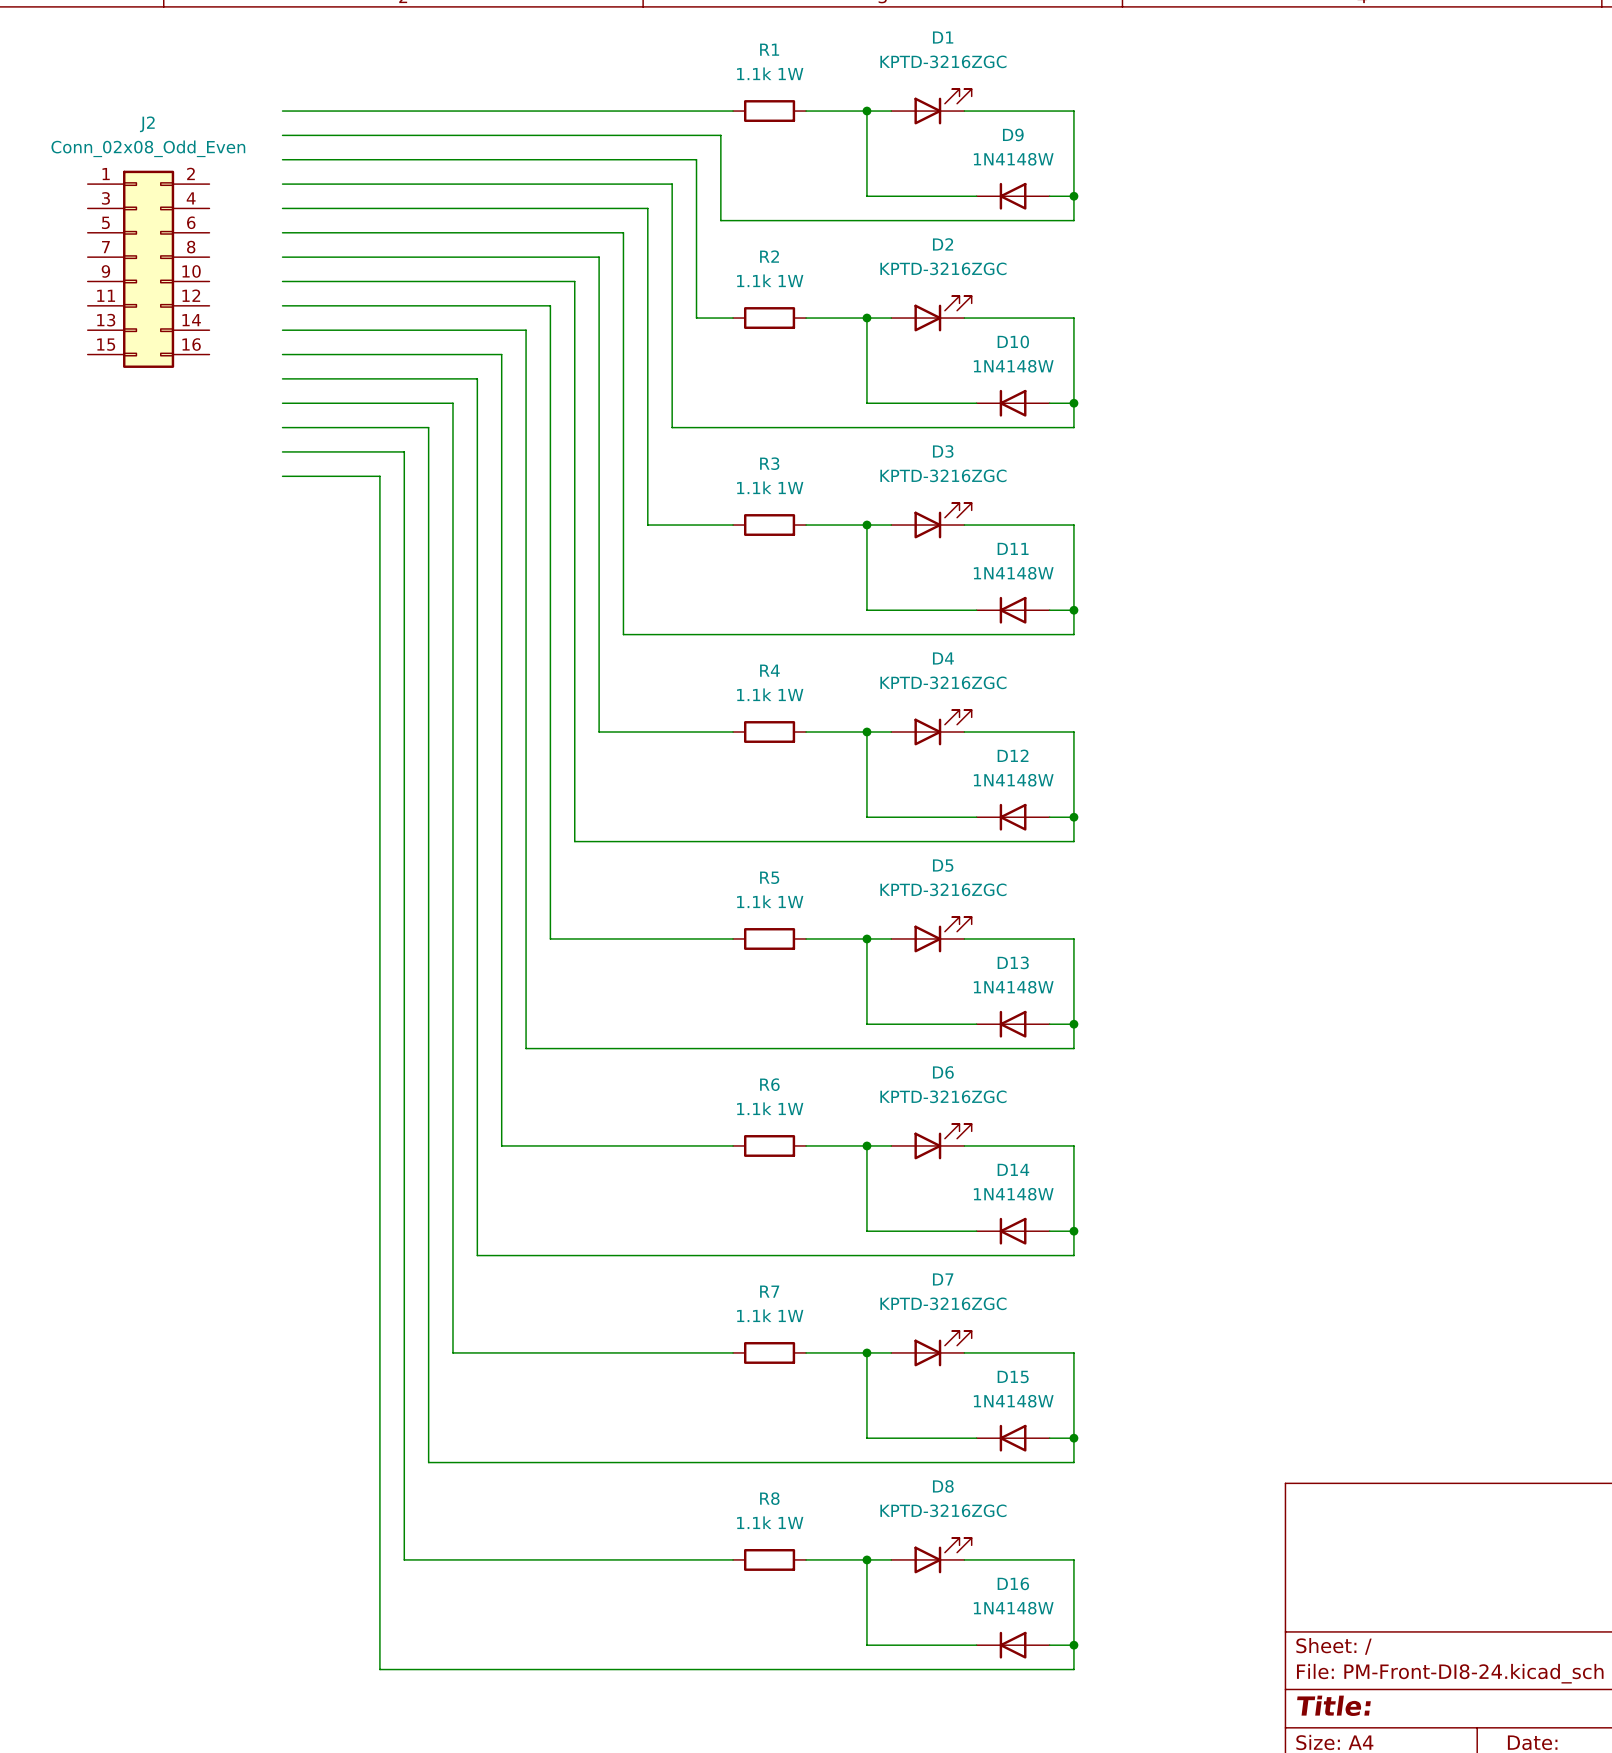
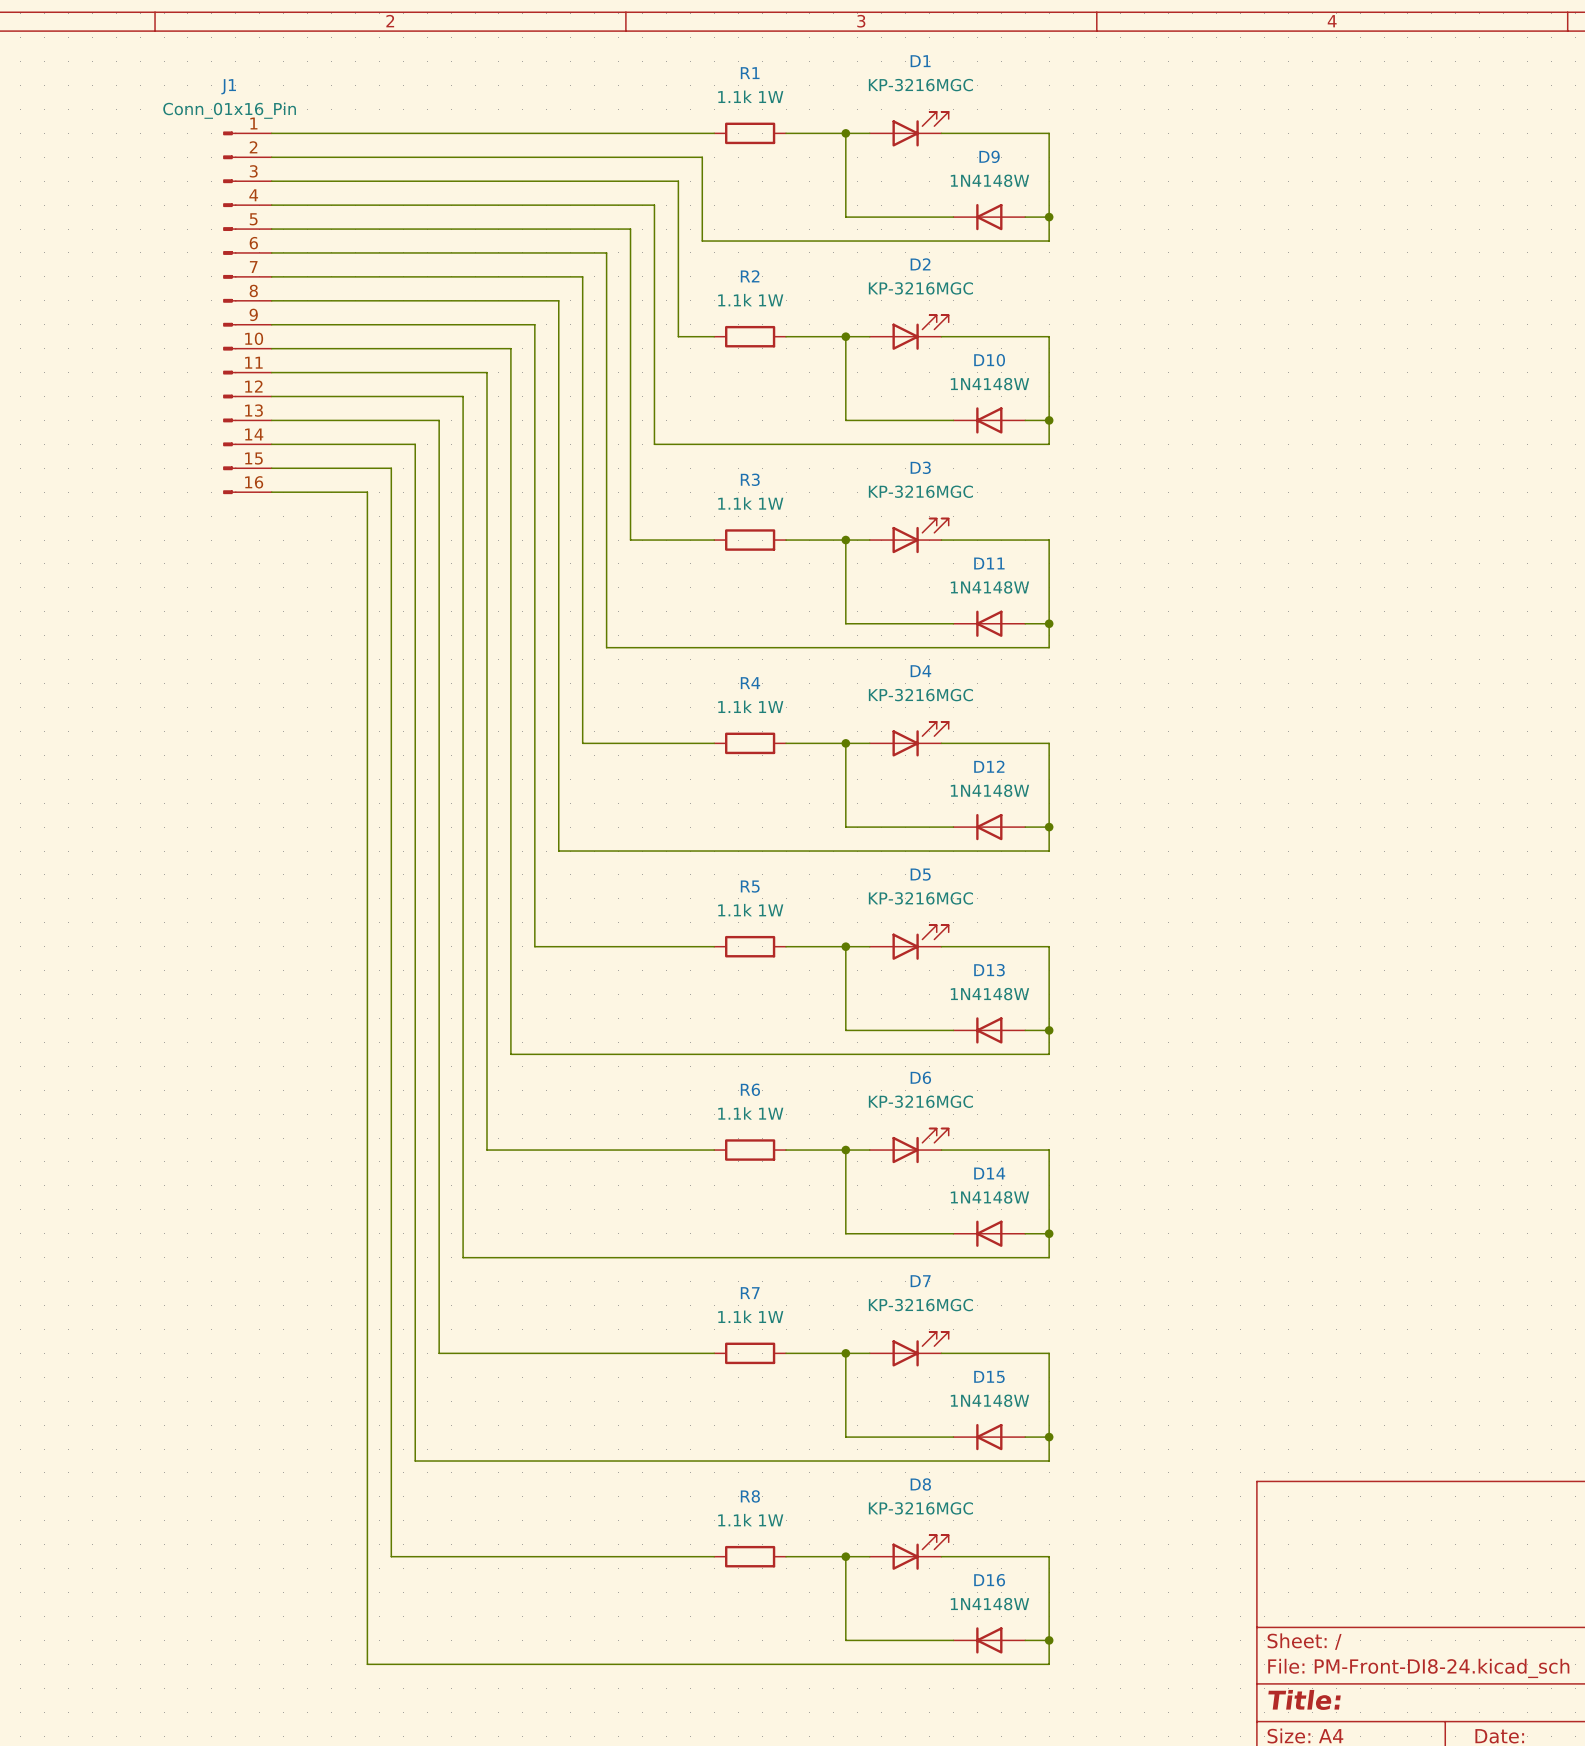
D1 value: KPTD-3216ZGC (943, 61) -> KP-3216MGC (920, 85)
D2 value: KPTD-3216ZGC (943, 268) -> KP-3216MGC (920, 288)
J2: Conn_02x08_Odd_Even (148, 269) -> none
J1: none -> Conn_01x16_Pin (247, 312)
D3 value: KPTD-3216ZGC (943, 475) -> KP-3216MGC (920, 491)
D4 value: KPTD-3216ZGC (943, 682) -> KP-3216MGC (920, 695)
D5 value: KPTD-3216ZGC (943, 889) -> KP-3216MGC (920, 898)
D6 value: KPTD-3216ZGC (943, 1096) -> KP-3216MGC (920, 1101)
D7 value: KPTD-3216ZGC (943, 1303) -> KP-3216MGC (920, 1305)
D8 value: KPTD-3216ZGC (943, 1510) -> KP-3216MGC (920, 1508)

